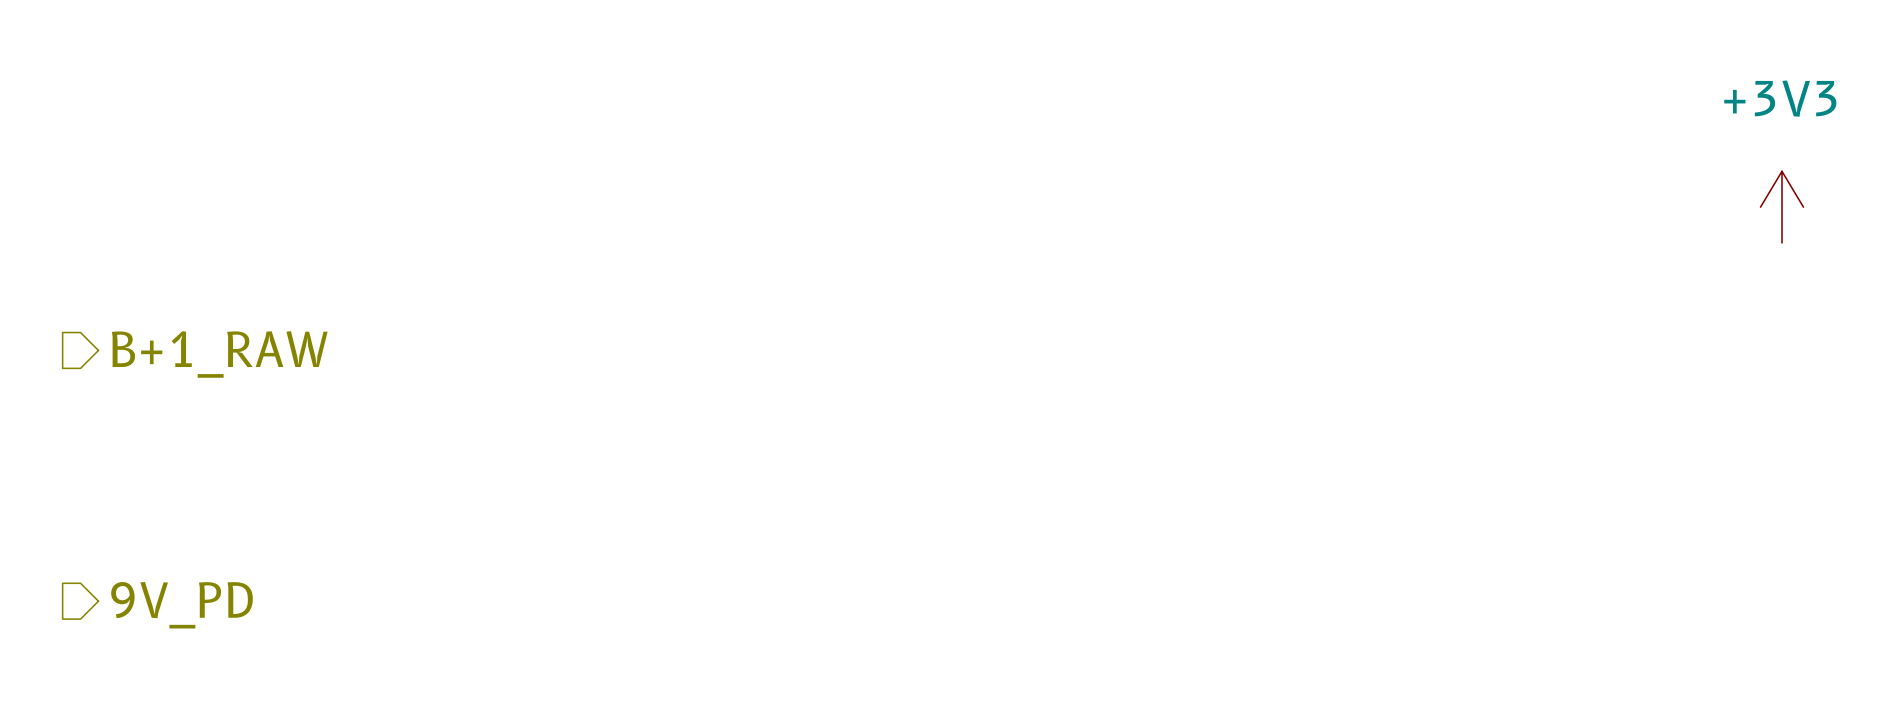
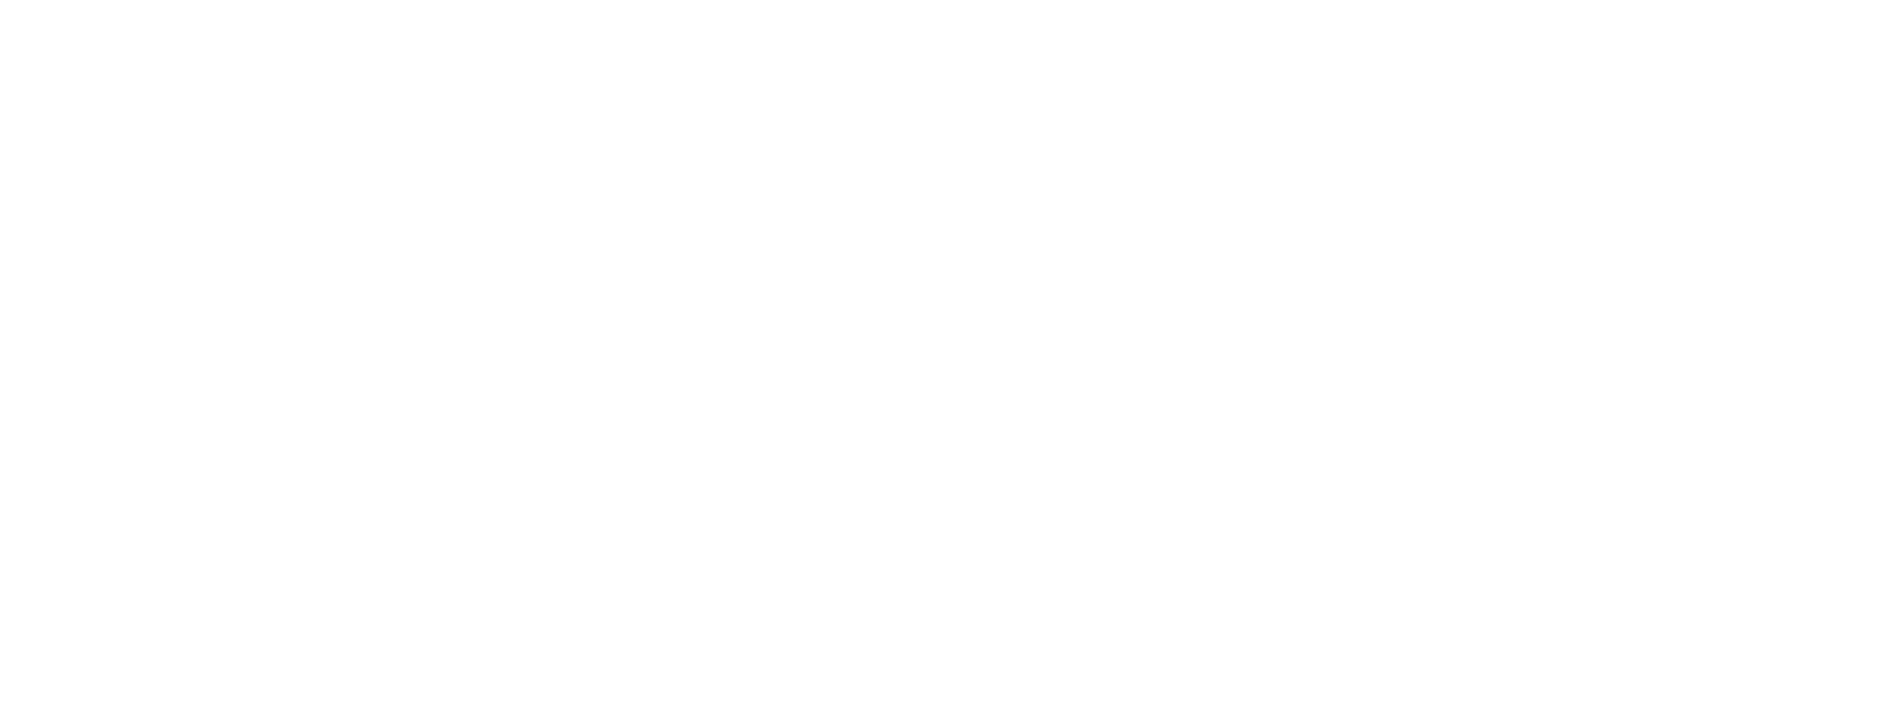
power symbol: +3V3 (1781, 207) -> none
hierarchical label: B+1_RAW (219, 354) -> none
hierarchical label: 9V_PD (182, 605) -> none

